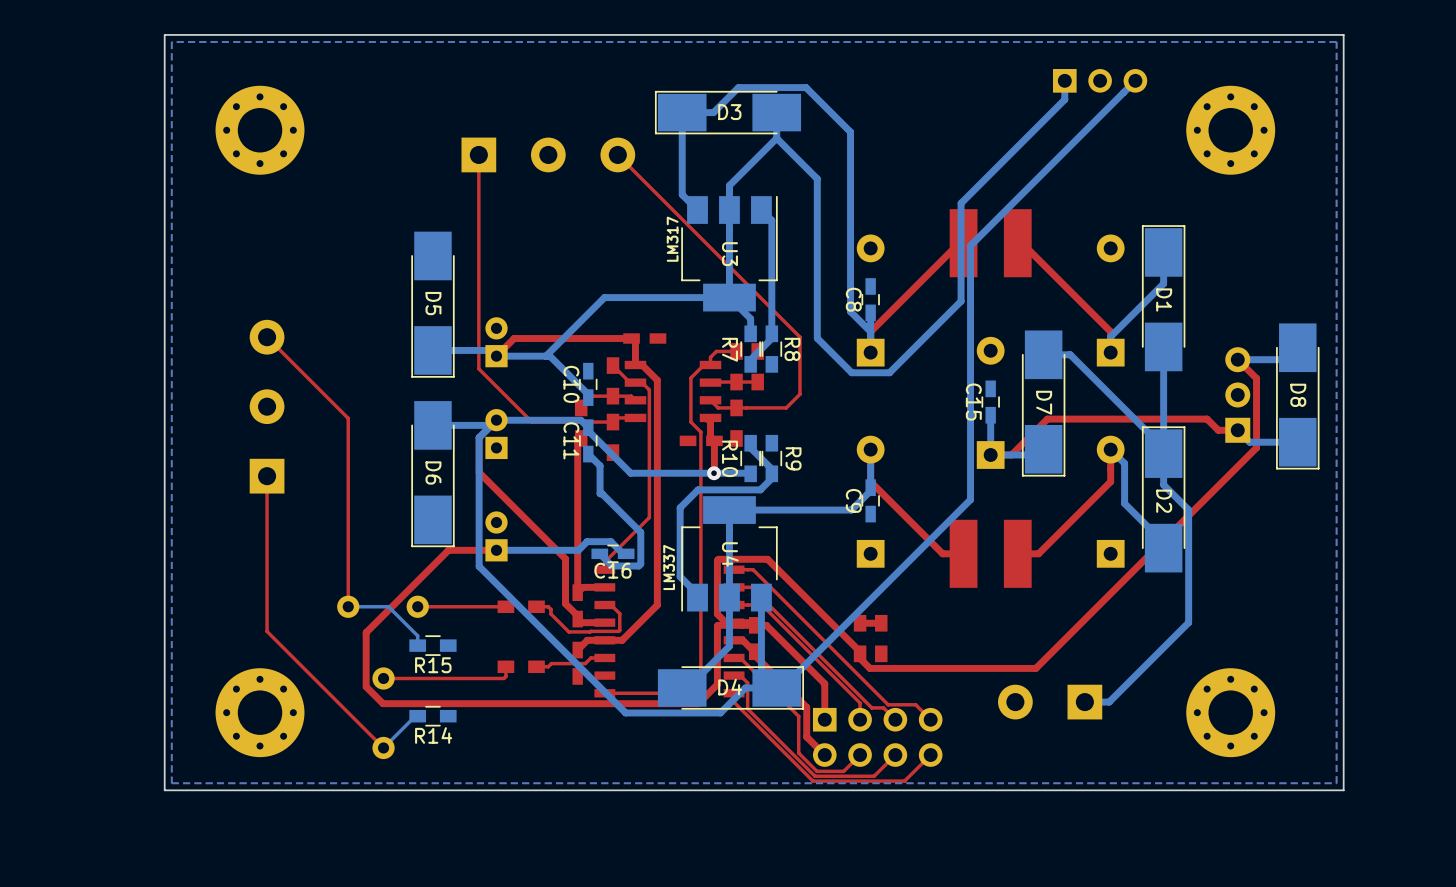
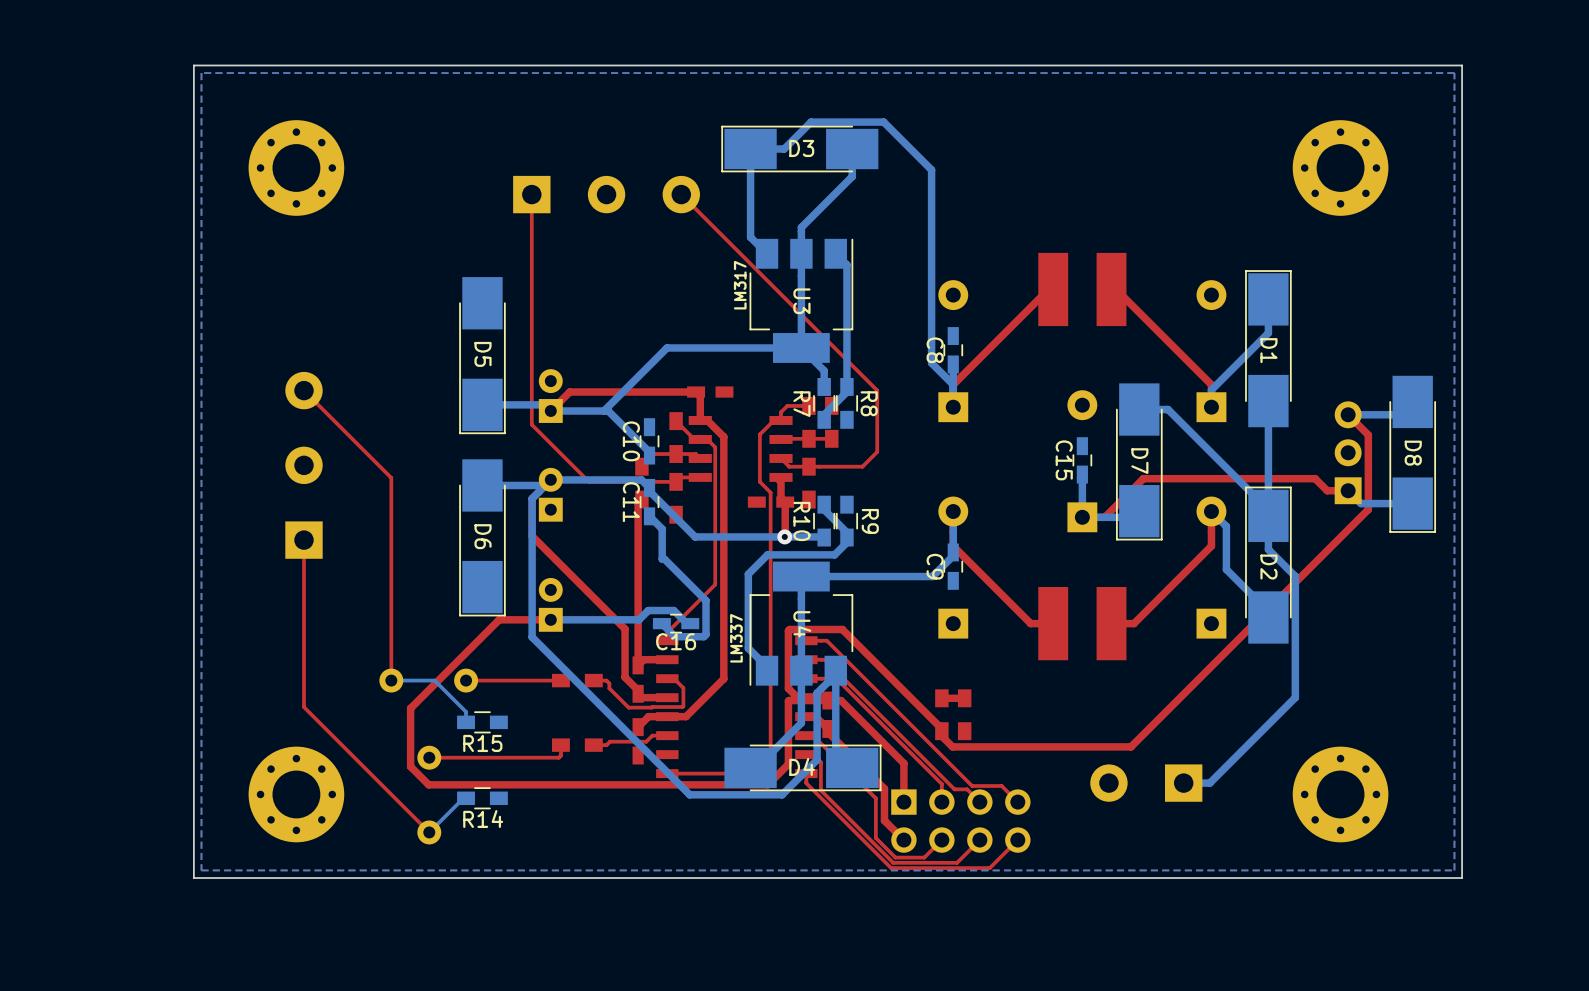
bottom track: (1064, 80) (1064, 99) (961, 203) (961, 301) (889, 372) (851, 372) (817, 338) (817, 178) (776, 138) -> none
part: (1100, 80) -> none
bottom track: (1135, 80) (970, 245) (970, 499) (782, 687) (745, 687) (720, 712) (711, 712) -> (835, 674) (817, 693) (817, 759) (782, 794)

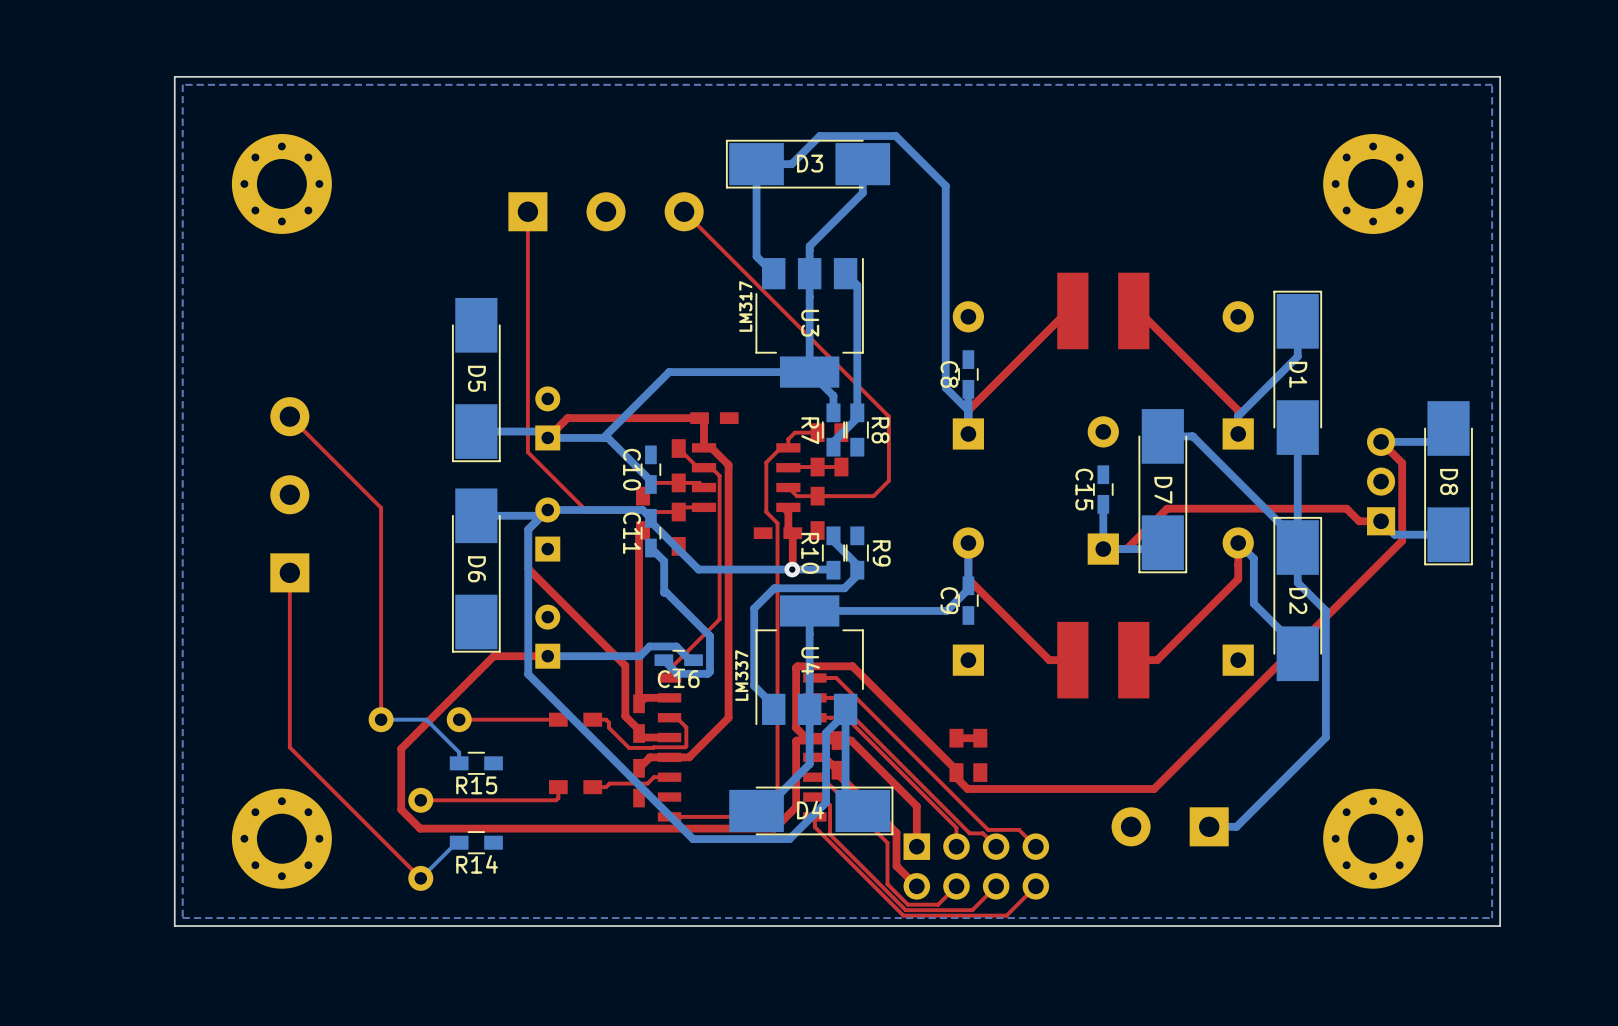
part footprint: [538, 369, 563, 423] -> [535, 386, 561, 451]
part footprint: [538, 467, 563, 522] -> [535, 497, 561, 562]
part footprint: [538, 577, 563, 632] -> [535, 604, 561, 669]

